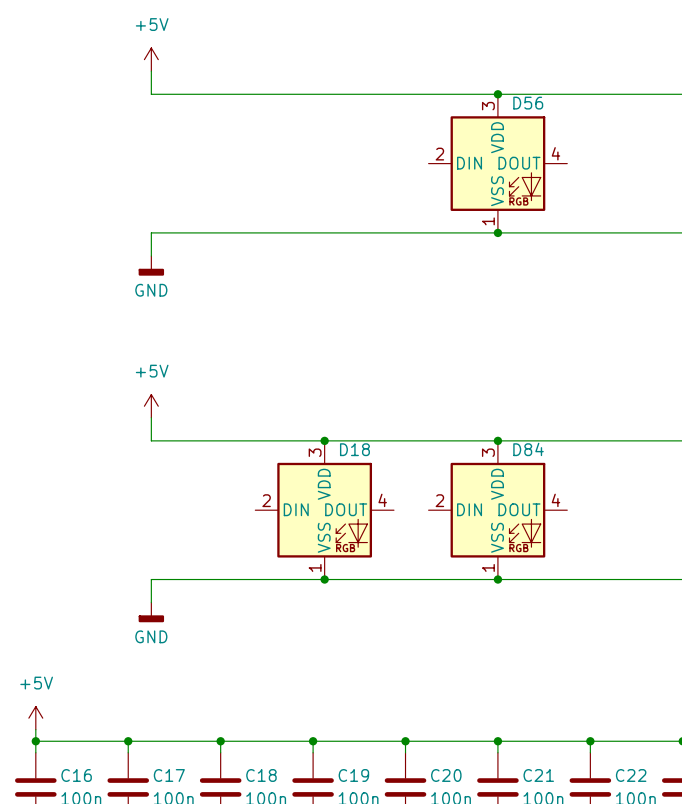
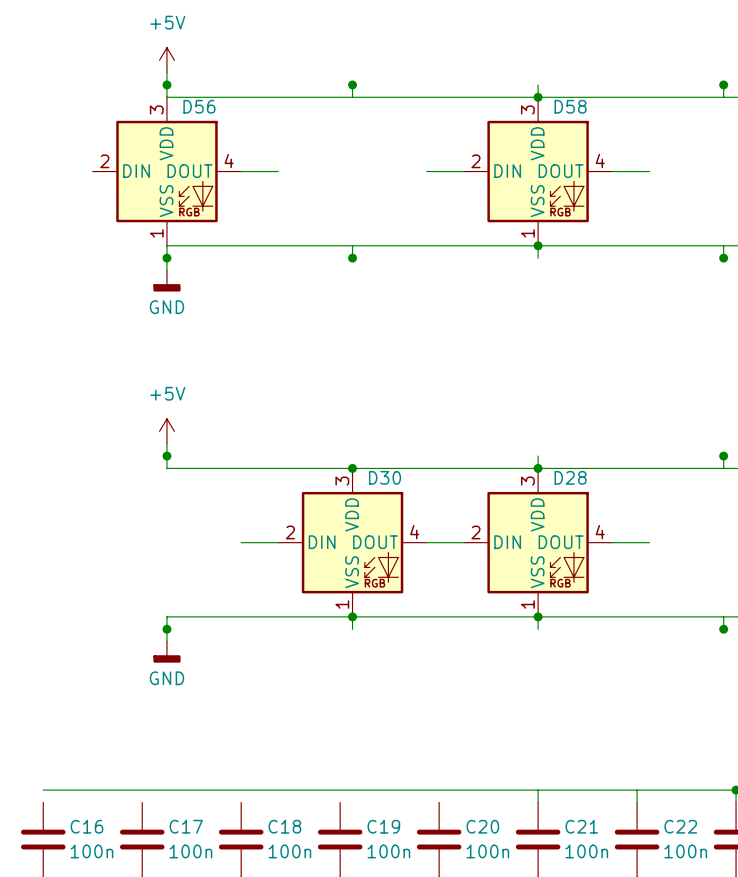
junction: none -> (166, 84)
wire: none -> (352, 84) (352, 97)
junction: none -> (352, 84)
wire: none -> (538, 84) (538, 97)
wire: none -> (723, 84) (723, 97)
junction: none -> (723, 84)
D56 name: D56 (528, 103) -> D58 (570, 106)
D56: none -> (166, 171)
wire: none -> (241, 171) (278, 171)
wire: none -> (426, 171) (463, 171)
wire: none -> (612, 171) (649, 171)
wire: none -> (352, 245) (352, 258)
wire: none -> (538, 245) (538, 258)
wire: none -> (723, 245) (723, 258)
junction: none -> (166, 258)
junction: none -> (352, 258)
junction: none -> (723, 258)
junction: none -> (166, 456)
wire: none -> (538, 456) (538, 468)
wire: none -> (723, 456) (723, 468)
junction: none -> (723, 456)
D18 name: D18 (354, 449) -> D30 (384, 477)
D84 name: D84 (528, 449) -> D28 (570, 477)
wire: none -> (241, 542) (278, 542)
wire: none -> (426, 542) (463, 542)
wire: none -> (612, 542) (649, 542)
wire: none -> (723, 616) (723, 629)
junction: none -> (166, 629)
junction: none -> (723, 629)
power symbol: +5V (35, 718) -> none
wire: (35, 729) (35, 752) -> none
junction: (35, 741) -> none
wire: (128, 741) (128, 752) -> none
junction: (128, 741) -> none
wire: (220, 741) (220, 752) -> none
junction: (220, 741) -> none
wire: (313, 741) (313, 752) -> (352, 616) (352, 629)
junction: (313, 741) -> none
wire: (405, 741) (405, 752) -> (538, 616) (538, 629)
junction: (405, 741) -> none
junction: (497, 741) -> none
junction: (590, 741) -> none

